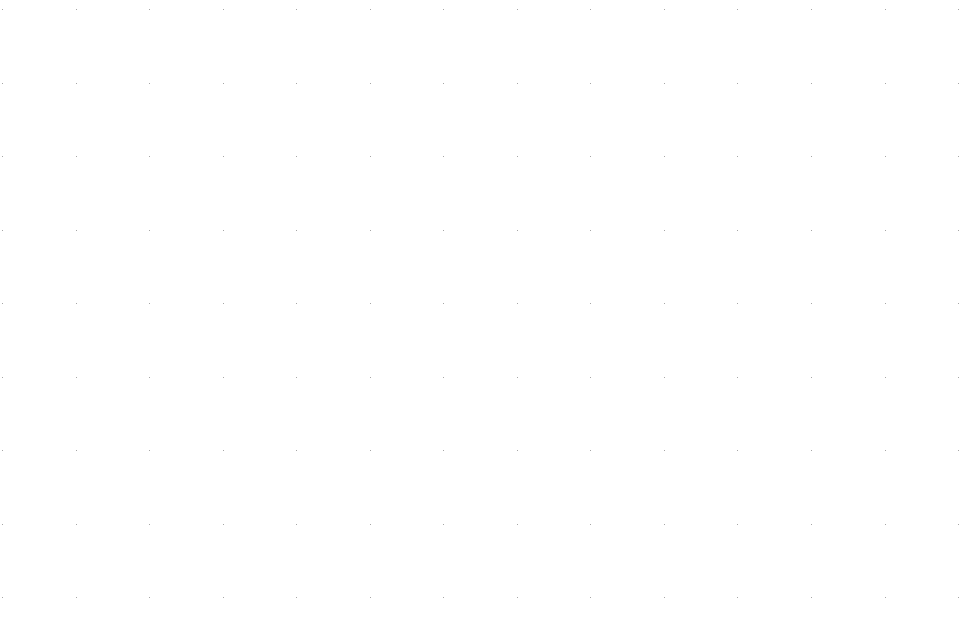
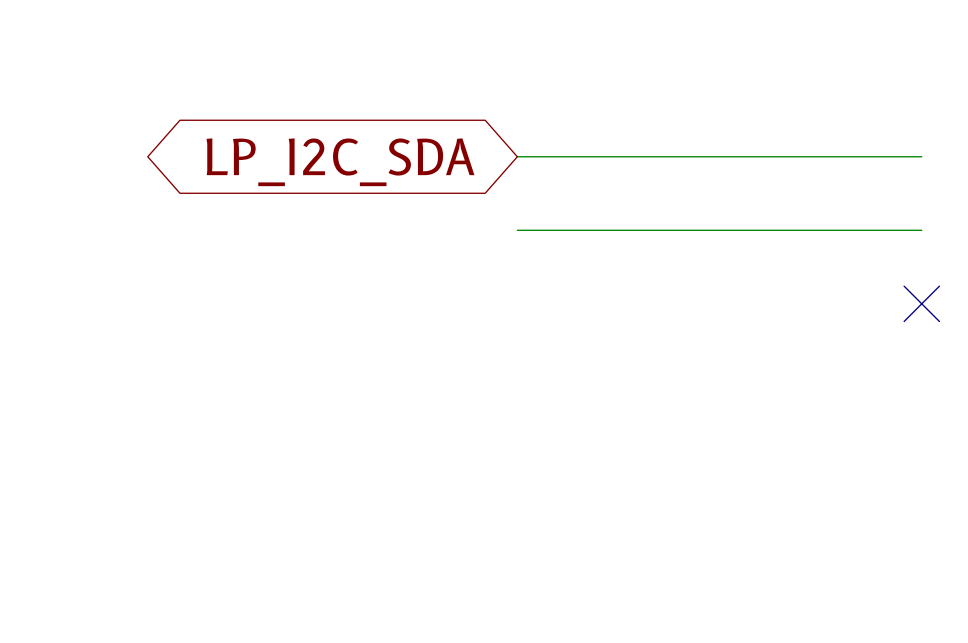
wire: none -> (517, 156) (921, 156)
global label: none -> LP_I2C_SDA (340, 162)
wire: none -> (517, 230) (921, 230)
no-connect mark: none -> (921, 303)

